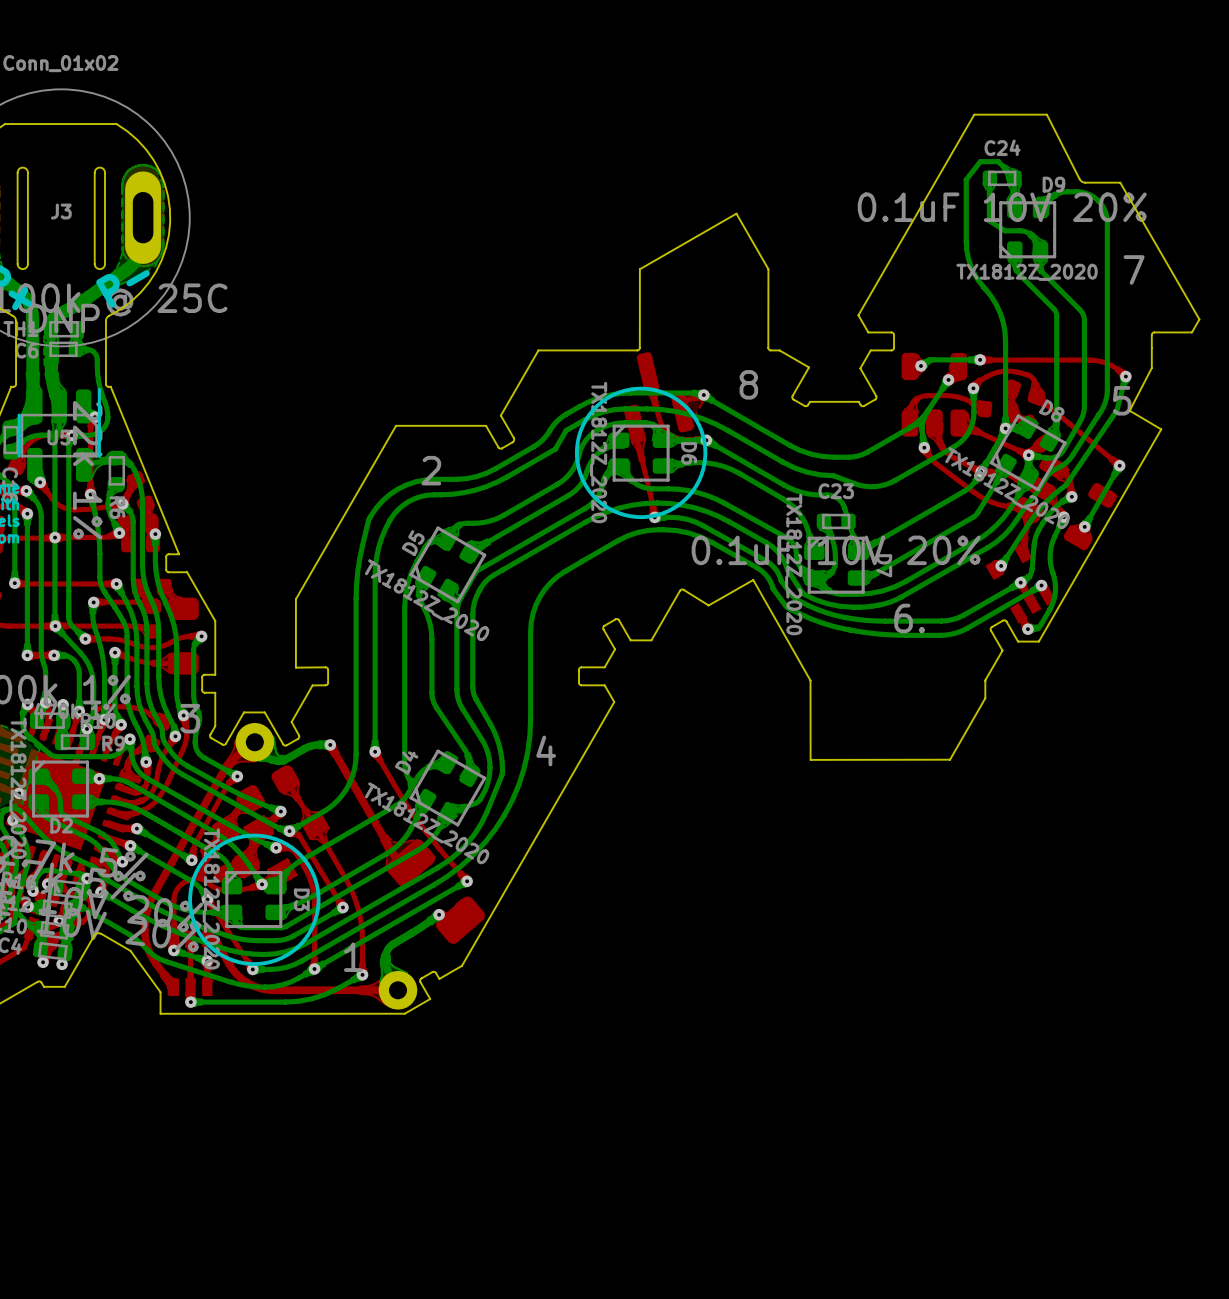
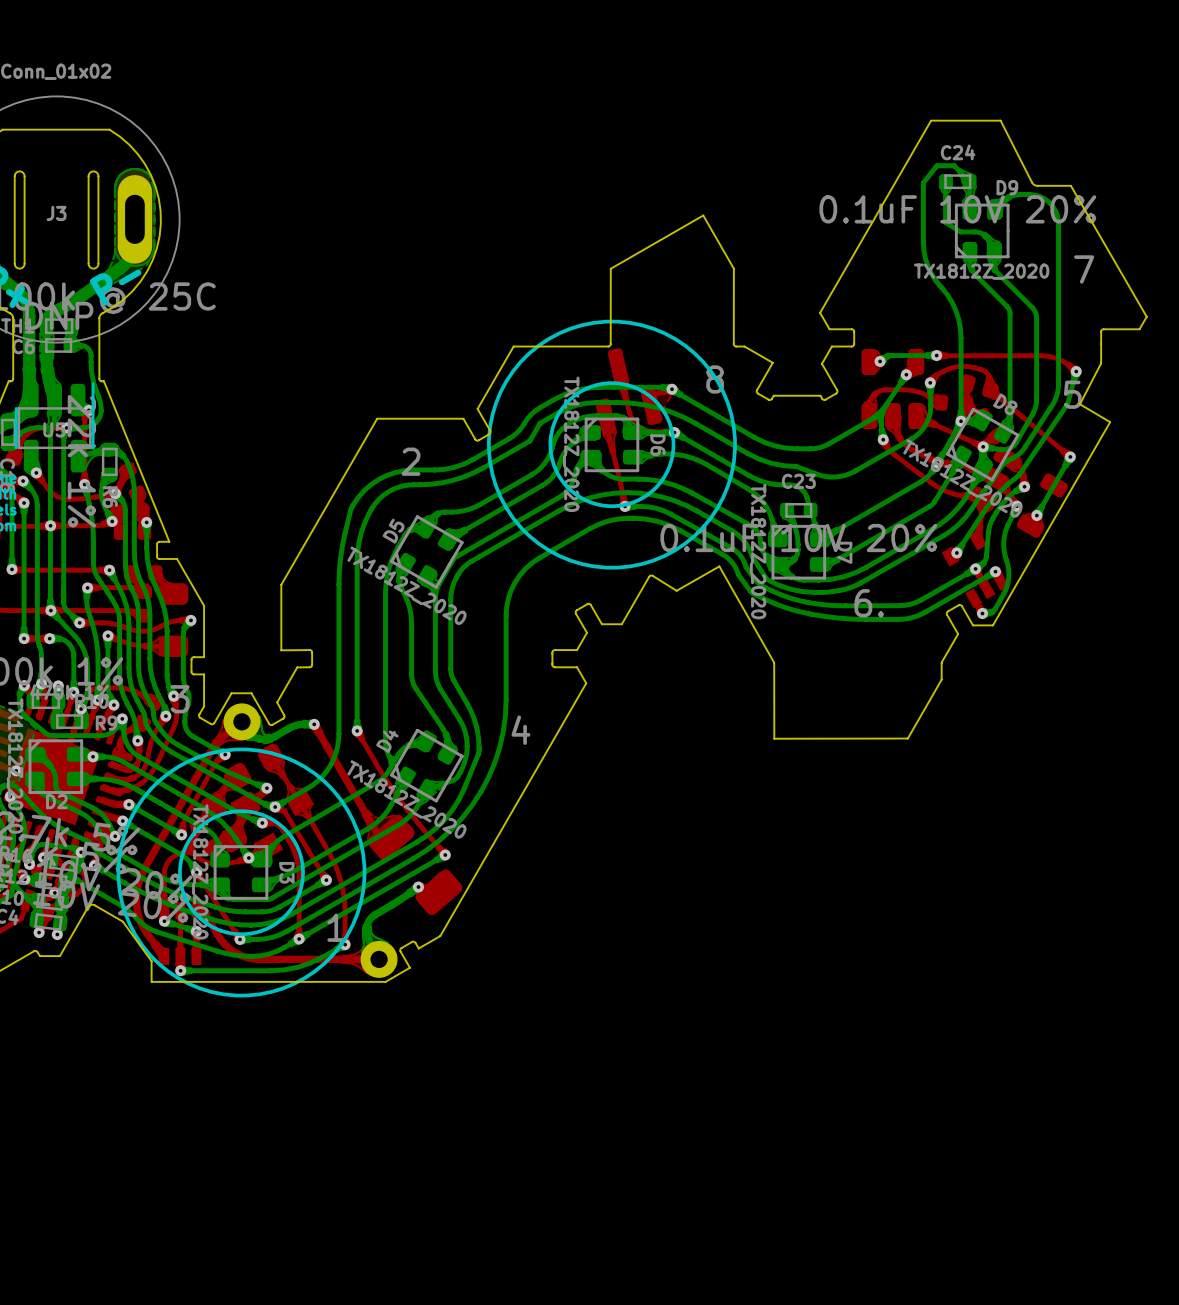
drawing: none -> [487, 319, 737, 570]
drawing: none -> [116, 747, 367, 998]

